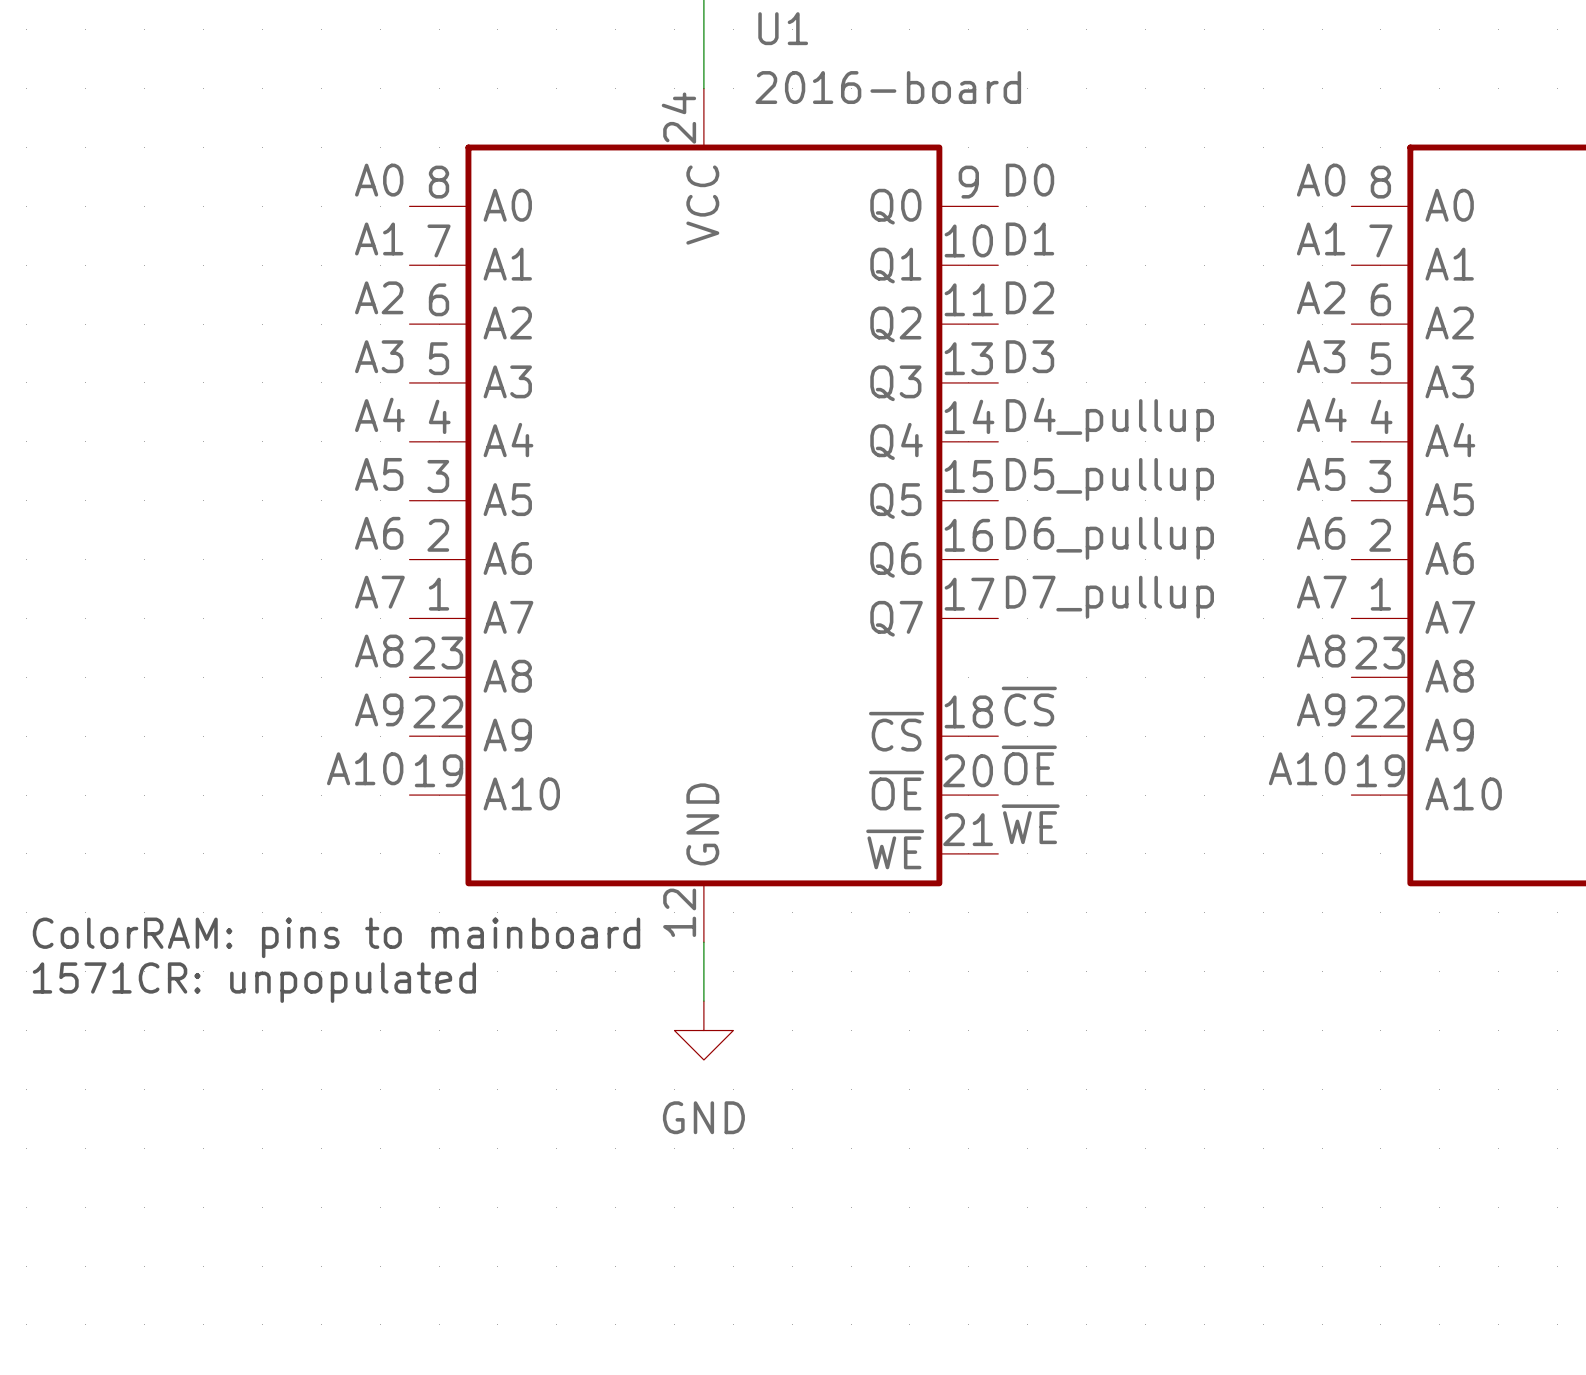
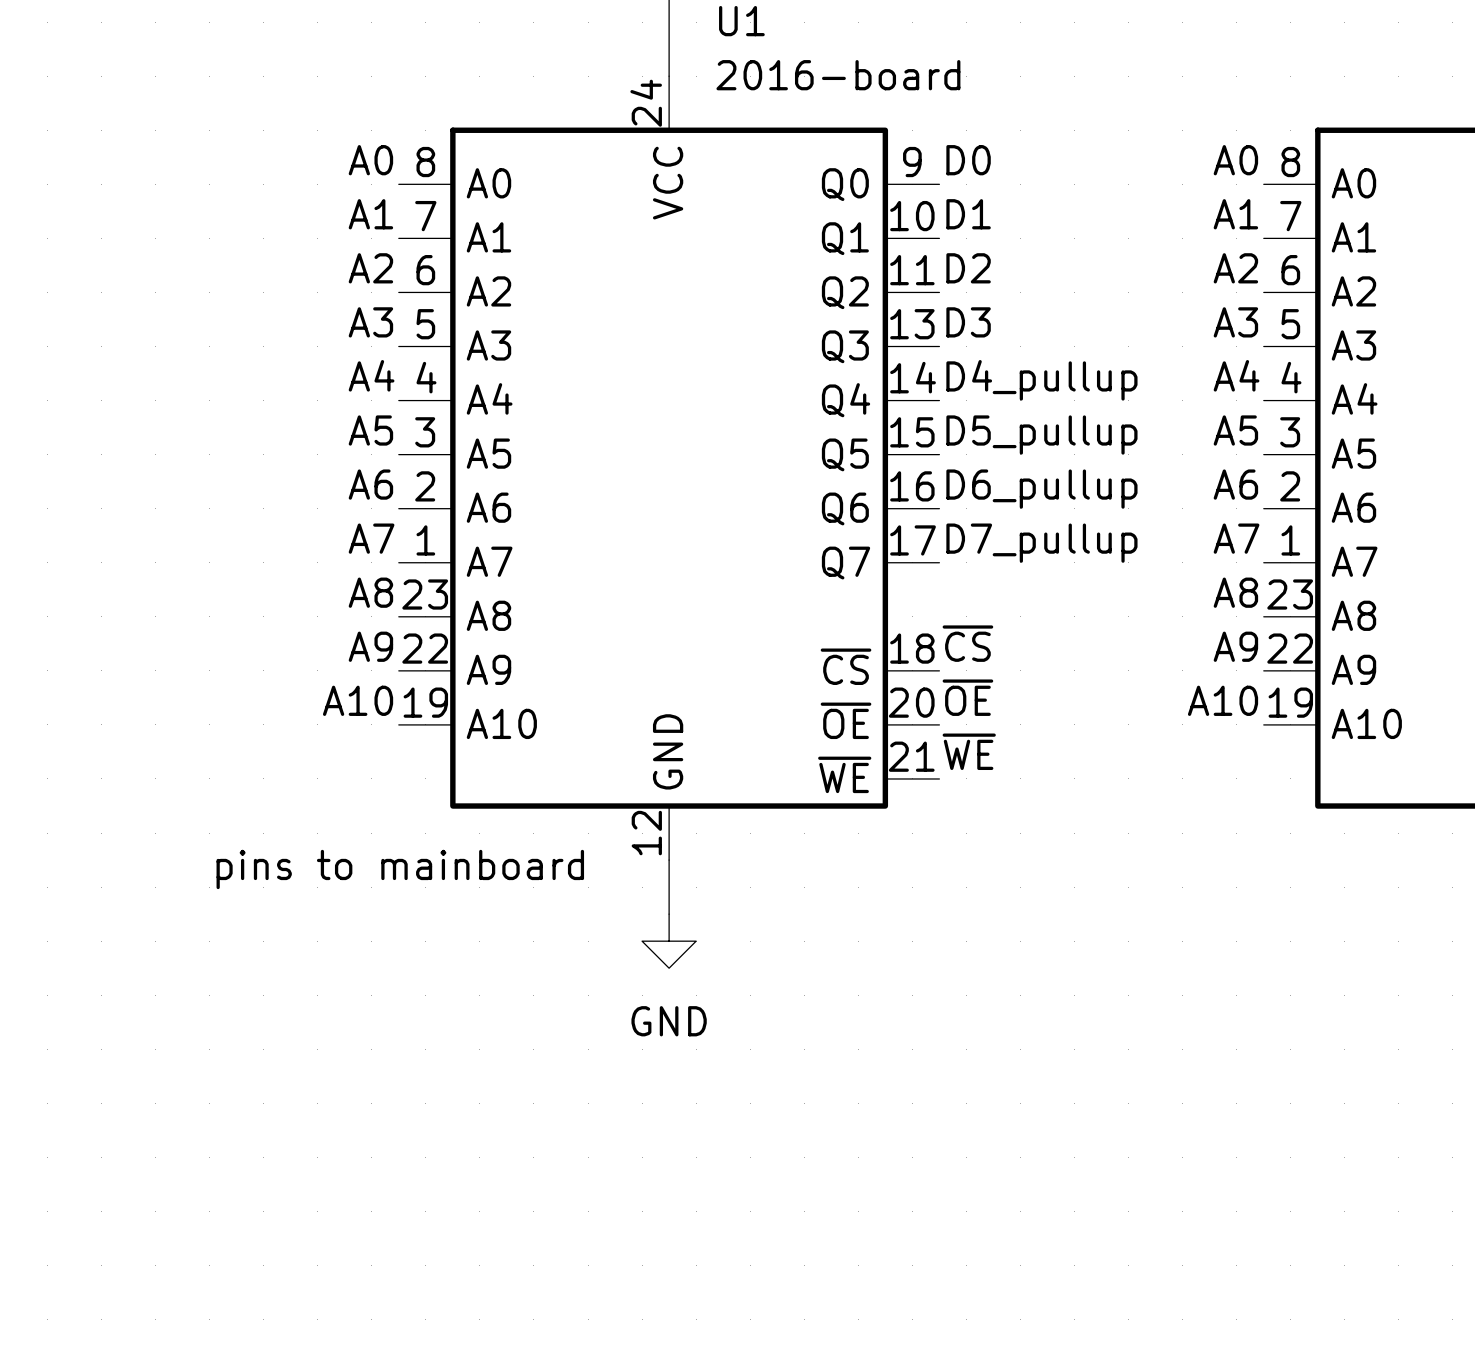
text: ColorRAM: pins to mainboard (336, 937) -> pins to mainboard (400, 869)
text: 1571CR: unpopulated (254, 982) -> none

